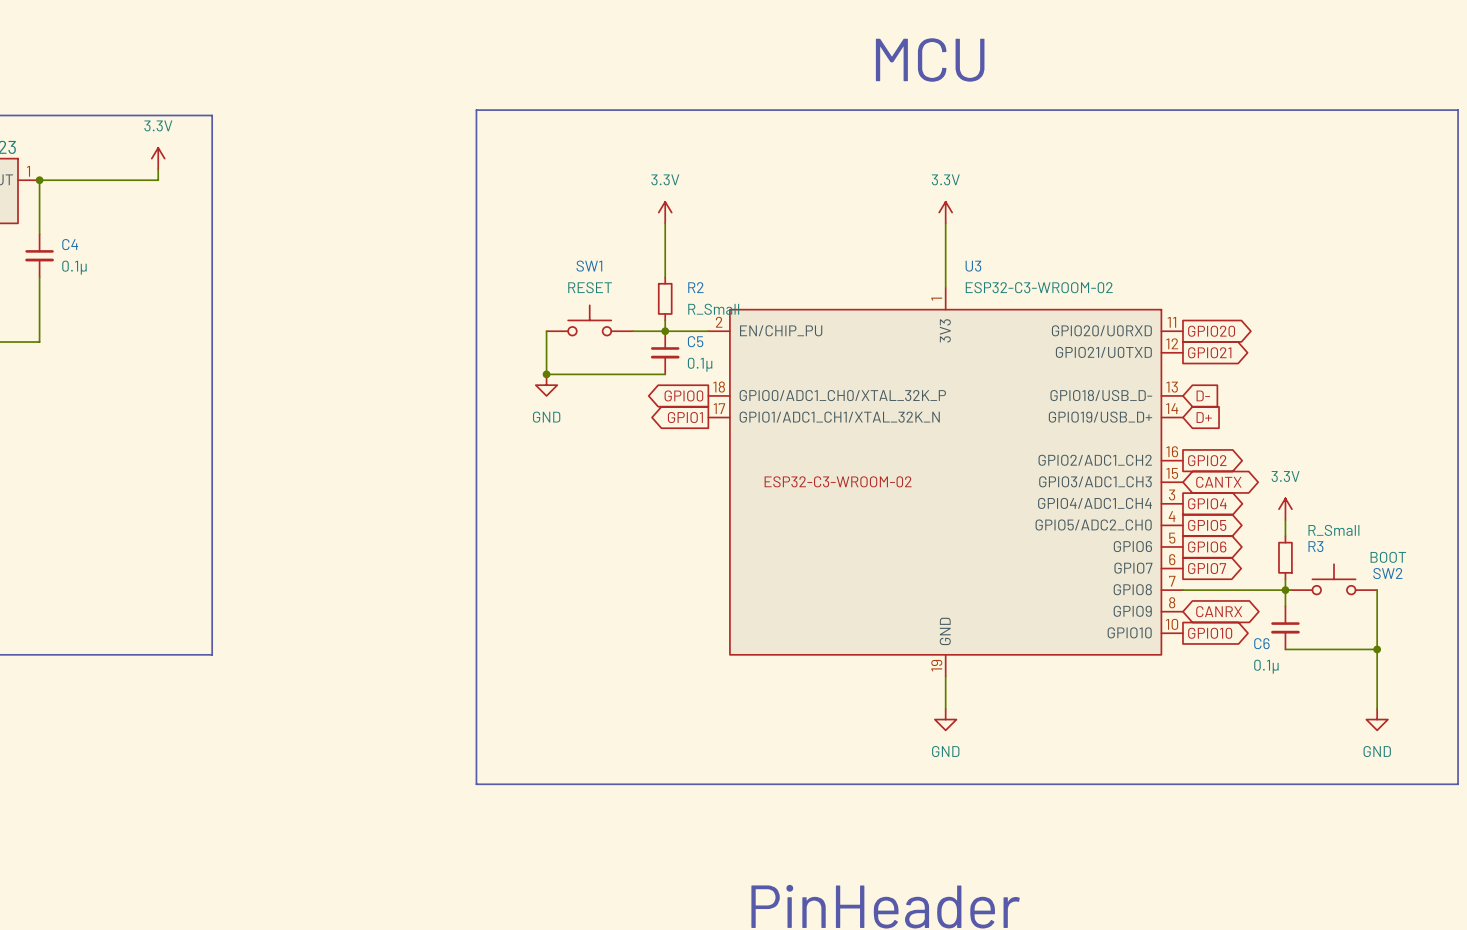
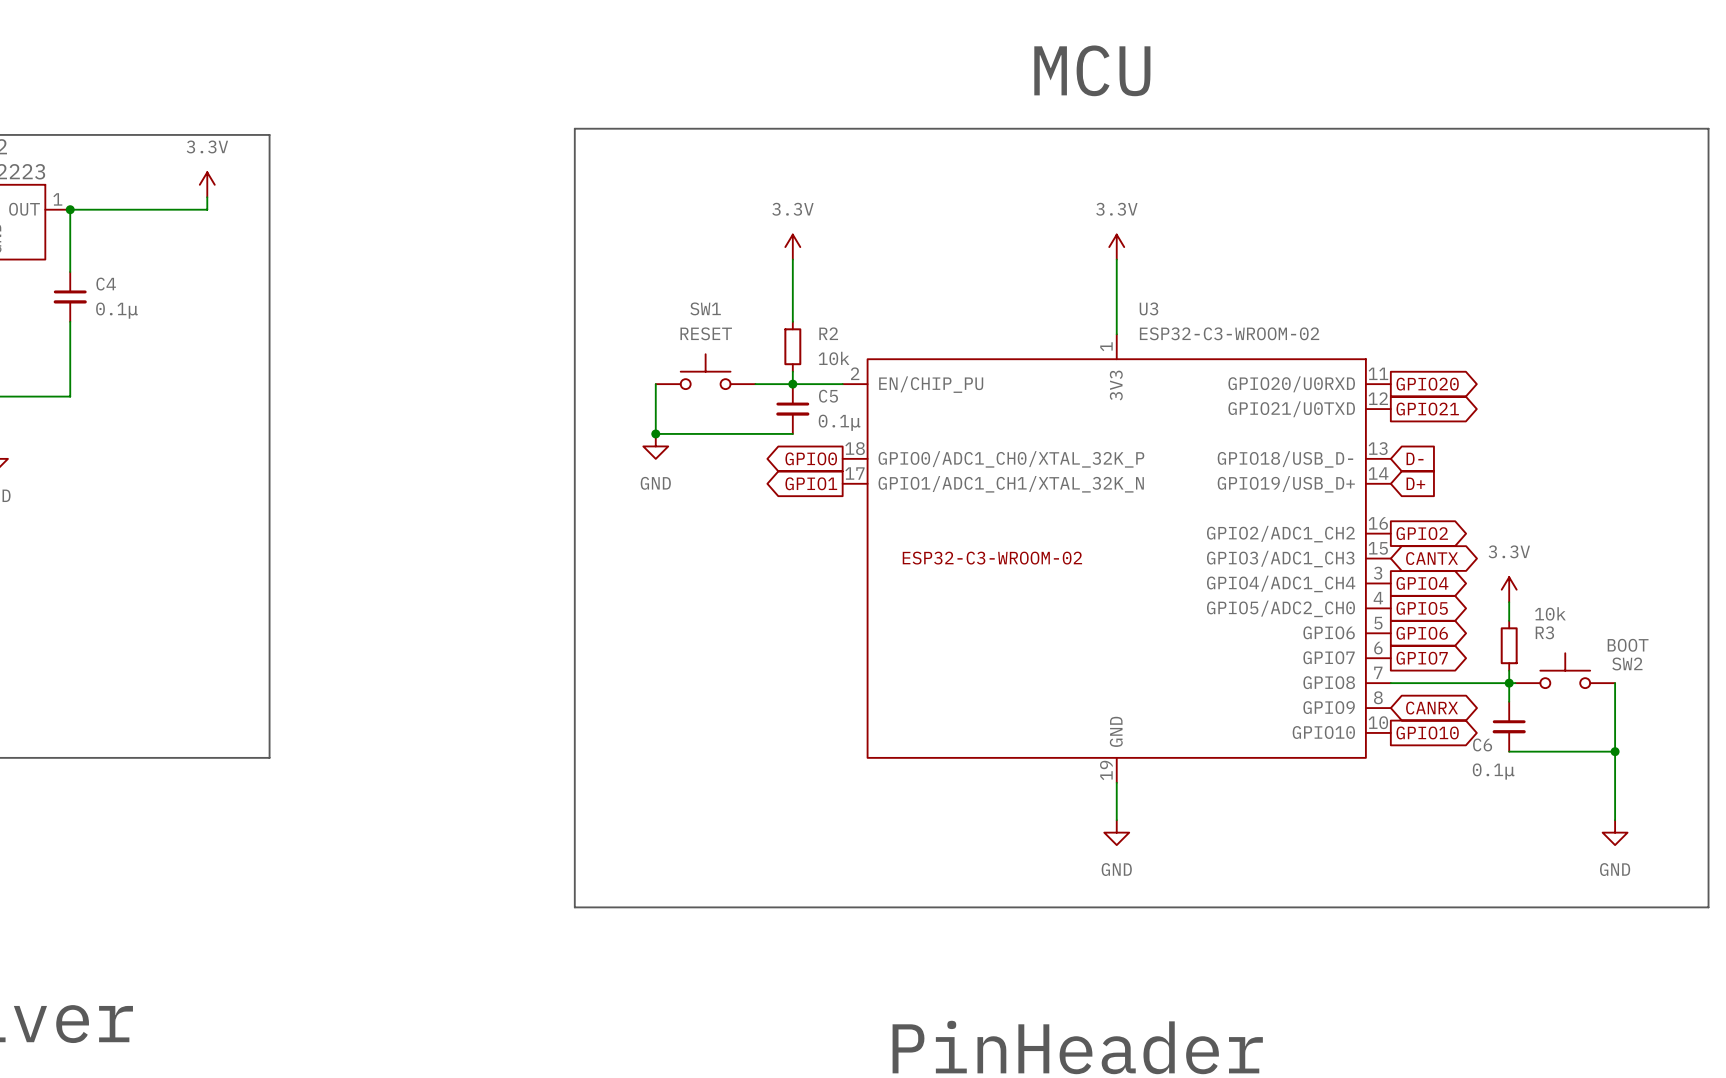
R2 value: R_Small (713, 309) -> 10k (834, 358)
R3 value: R_Small (1333, 530) -> 10k (1550, 613)

